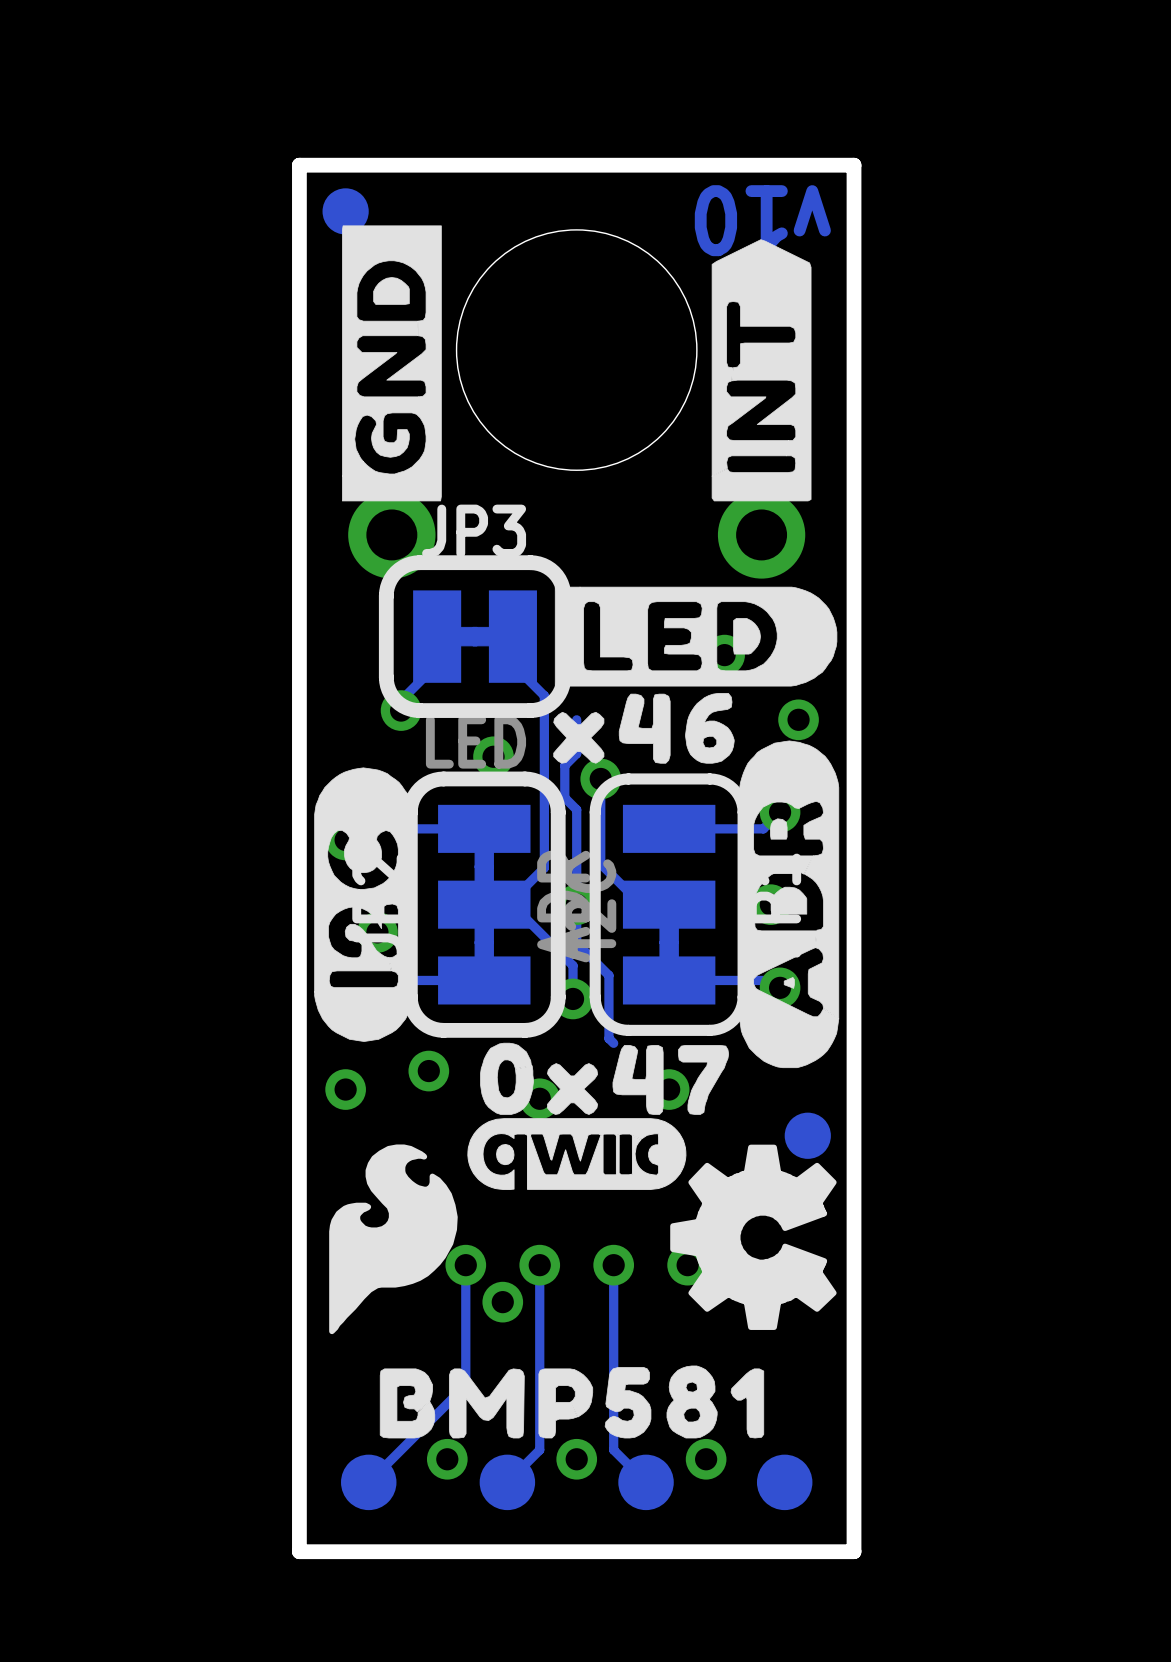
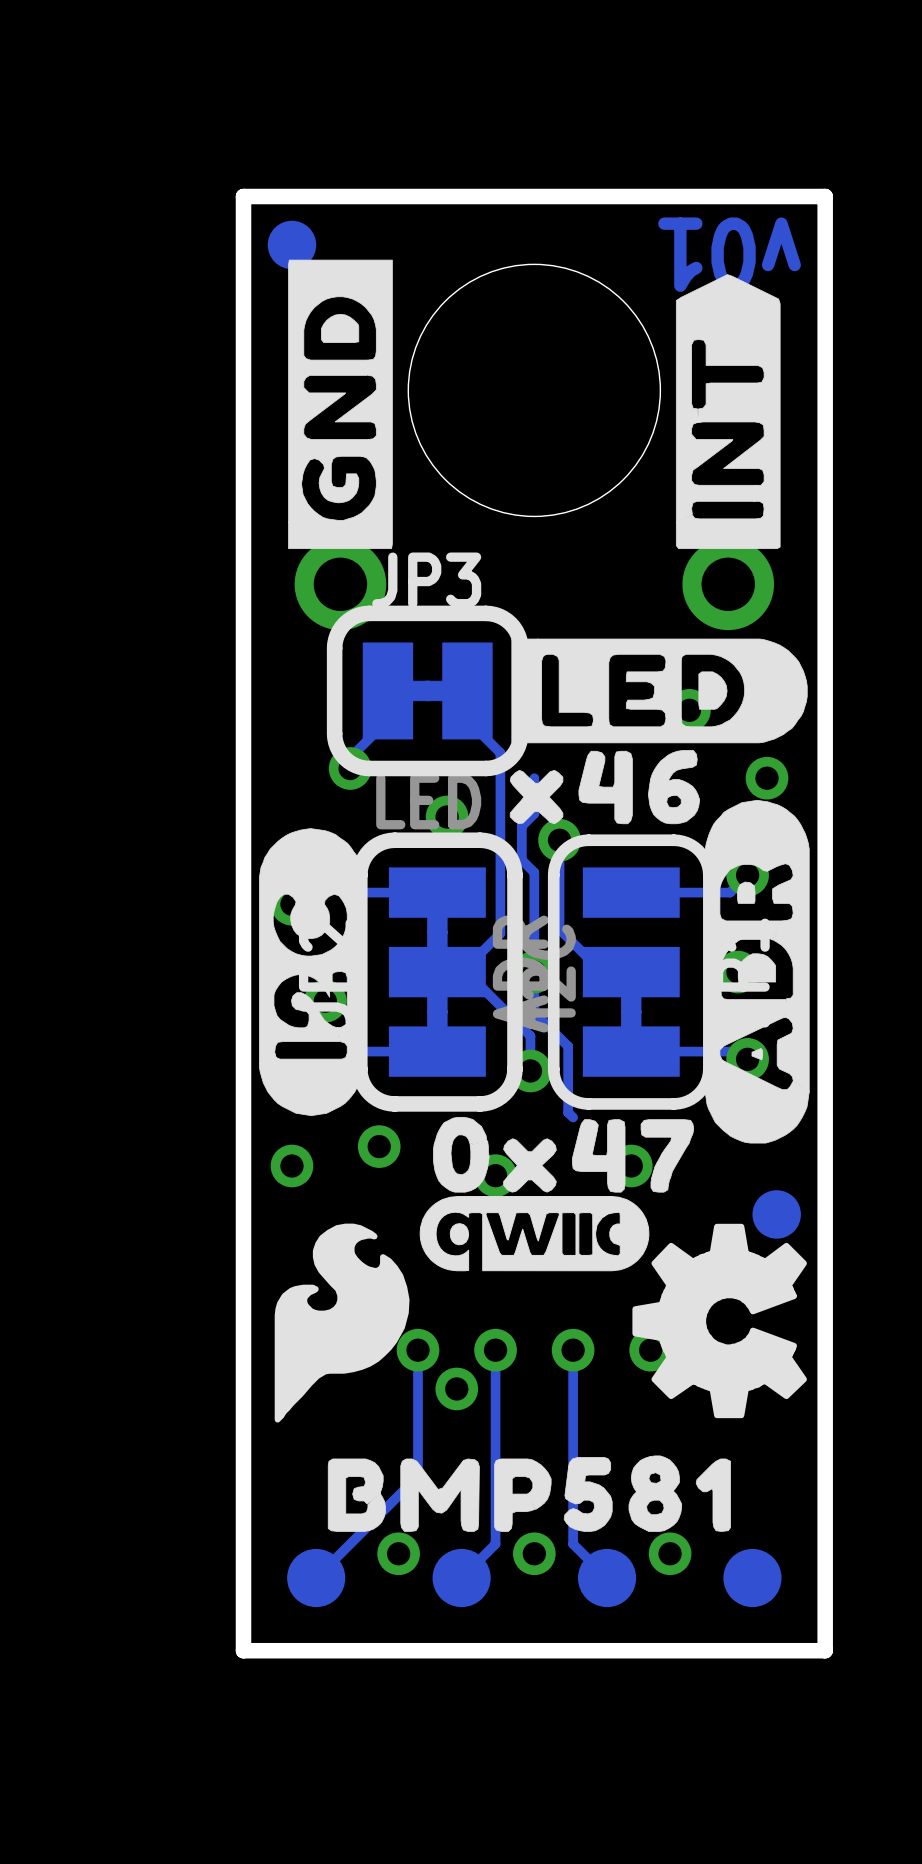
text: v10 (762, 220) -> v01 (729, 254)

